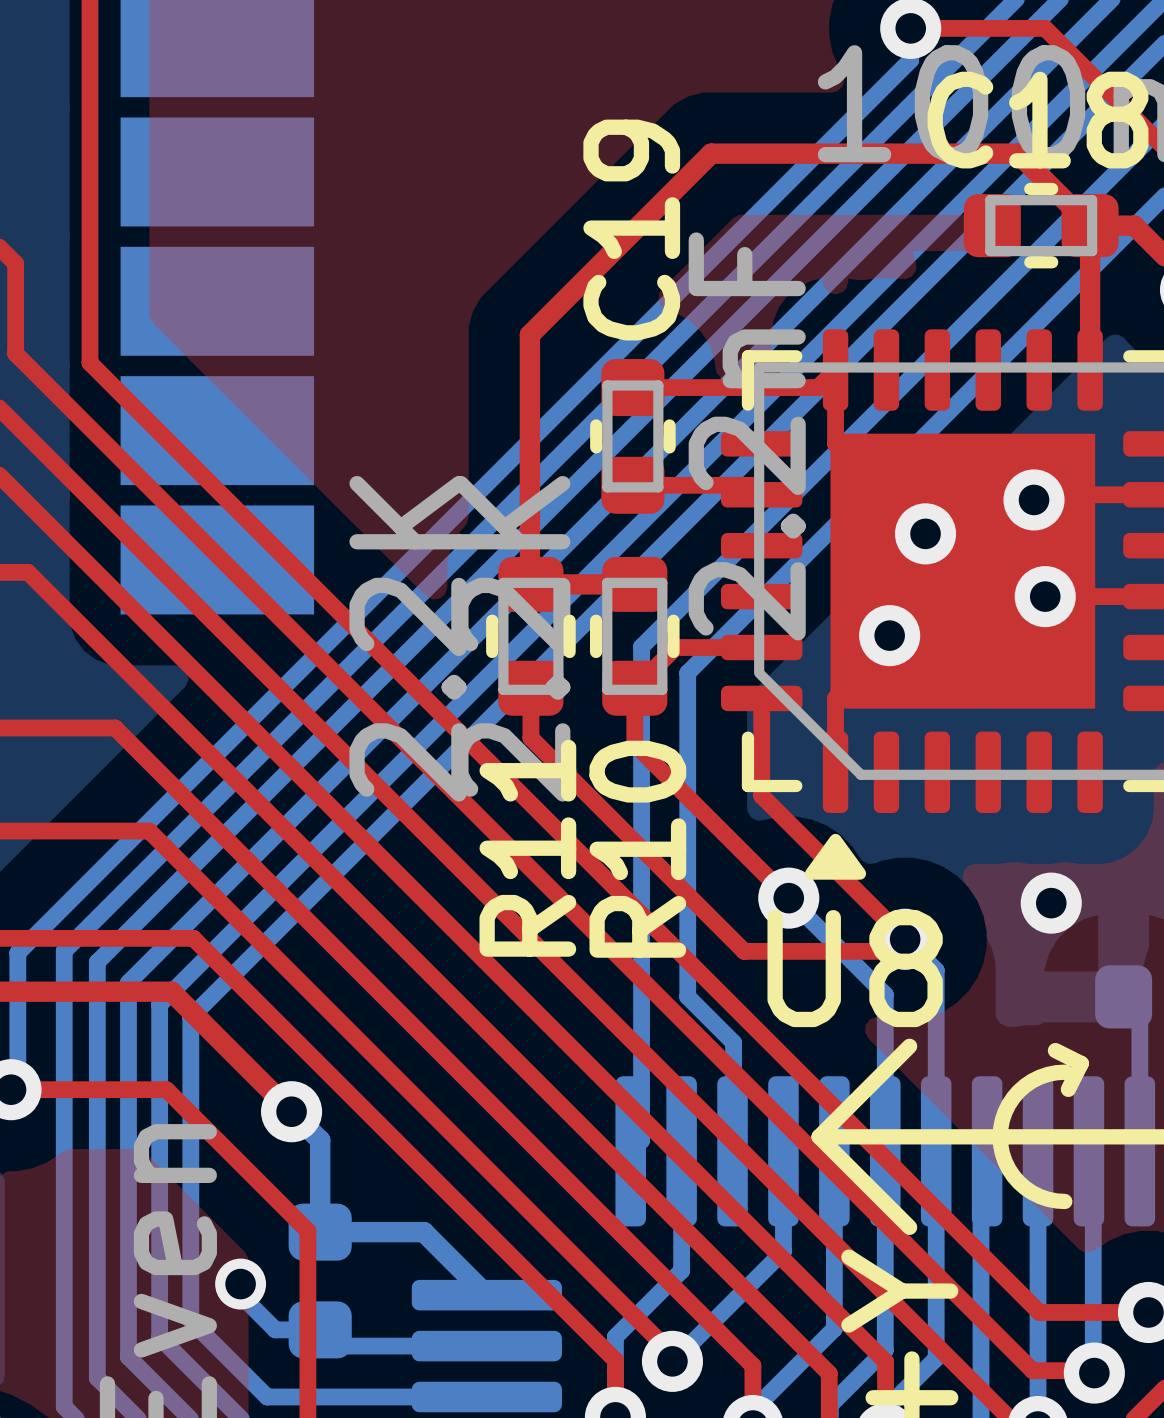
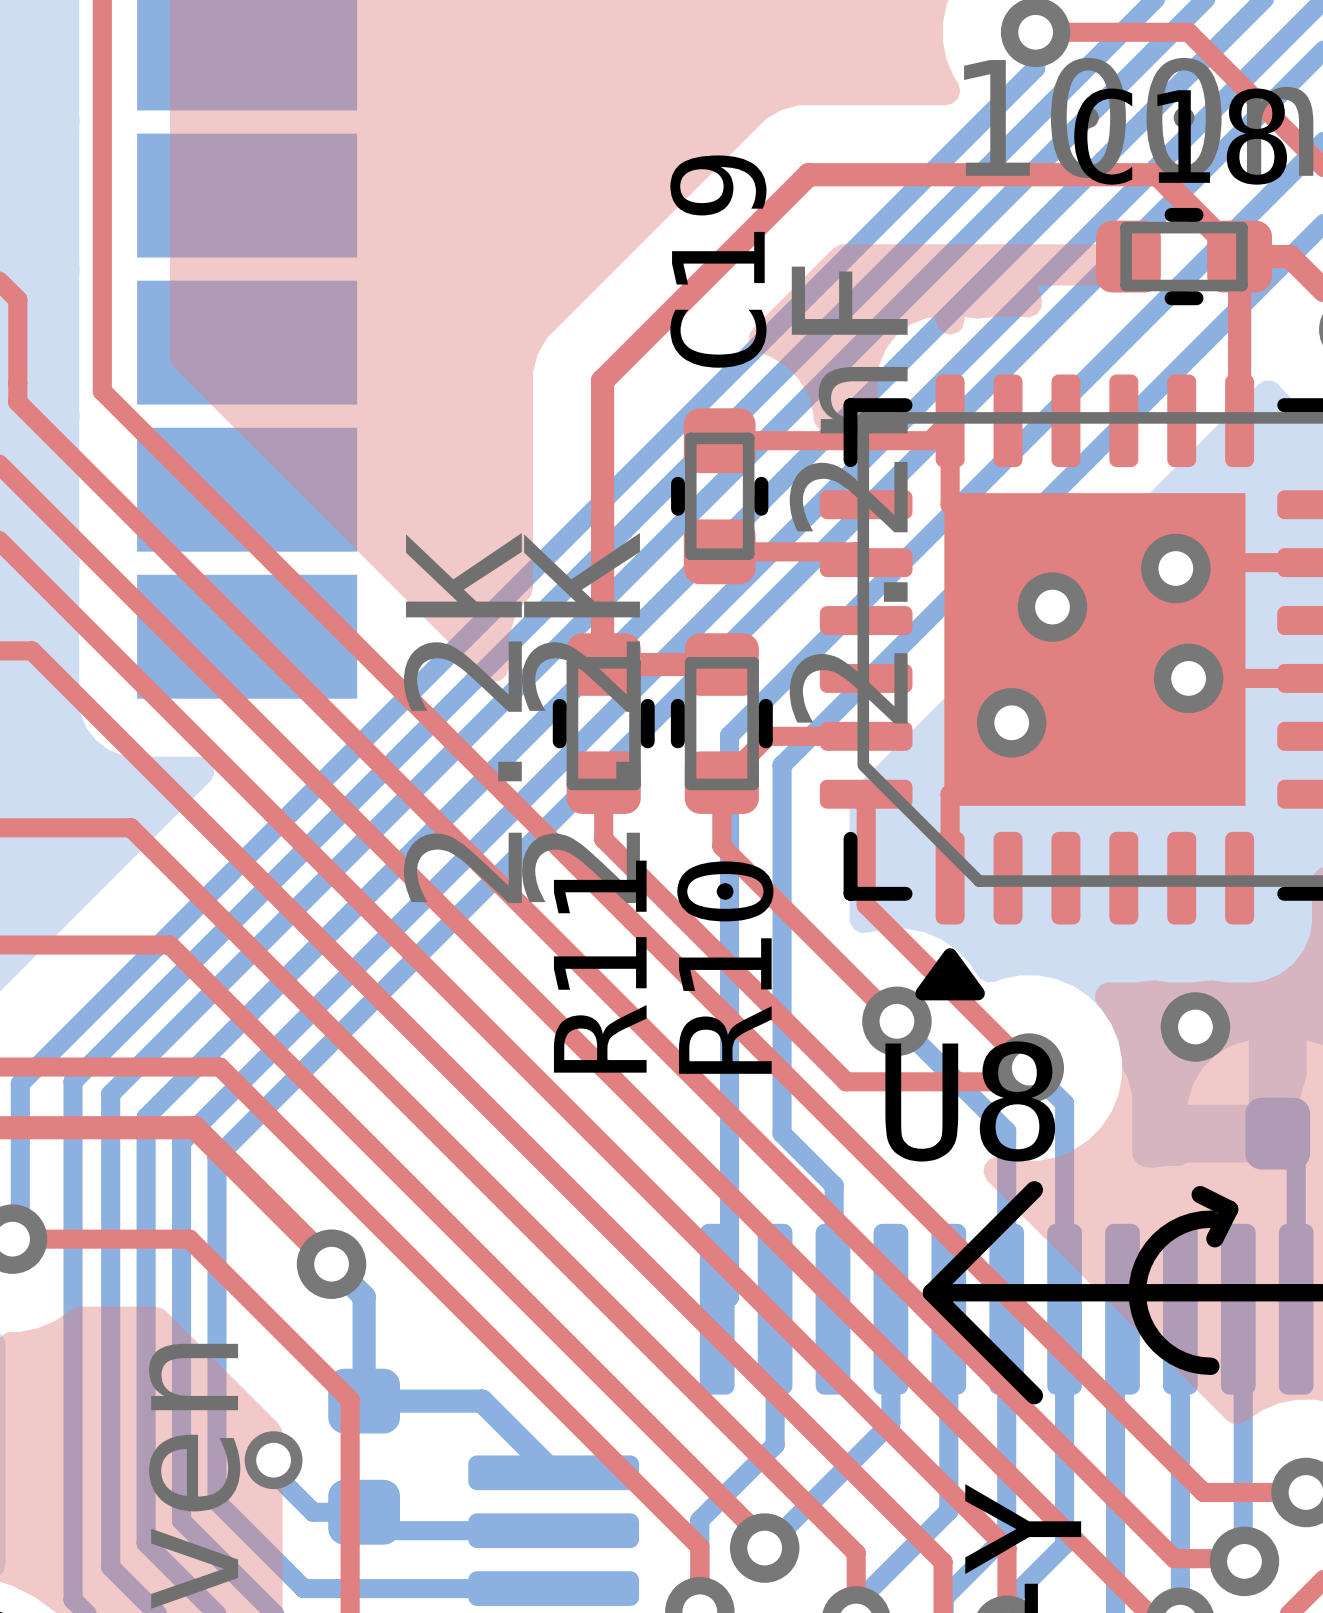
top track: (89, 344) (89, 362) (1039, 1312) (1058, 1312) -> (102, 391) (1203, 1492)

